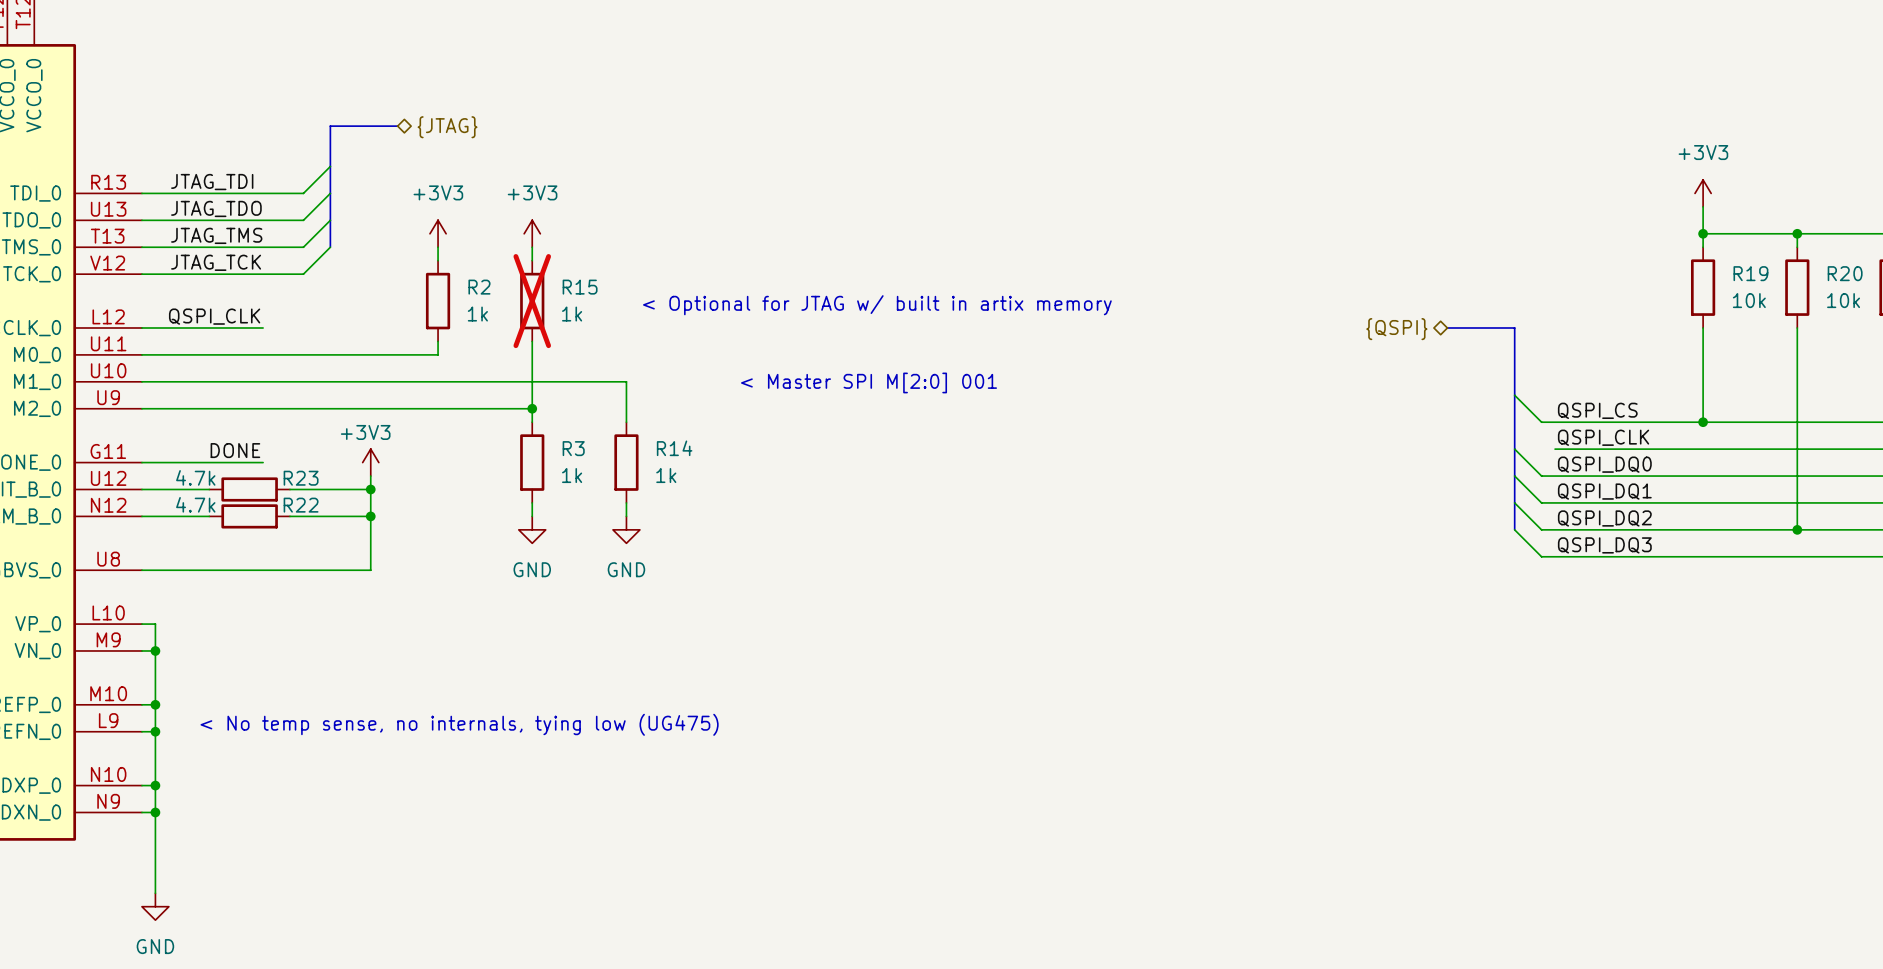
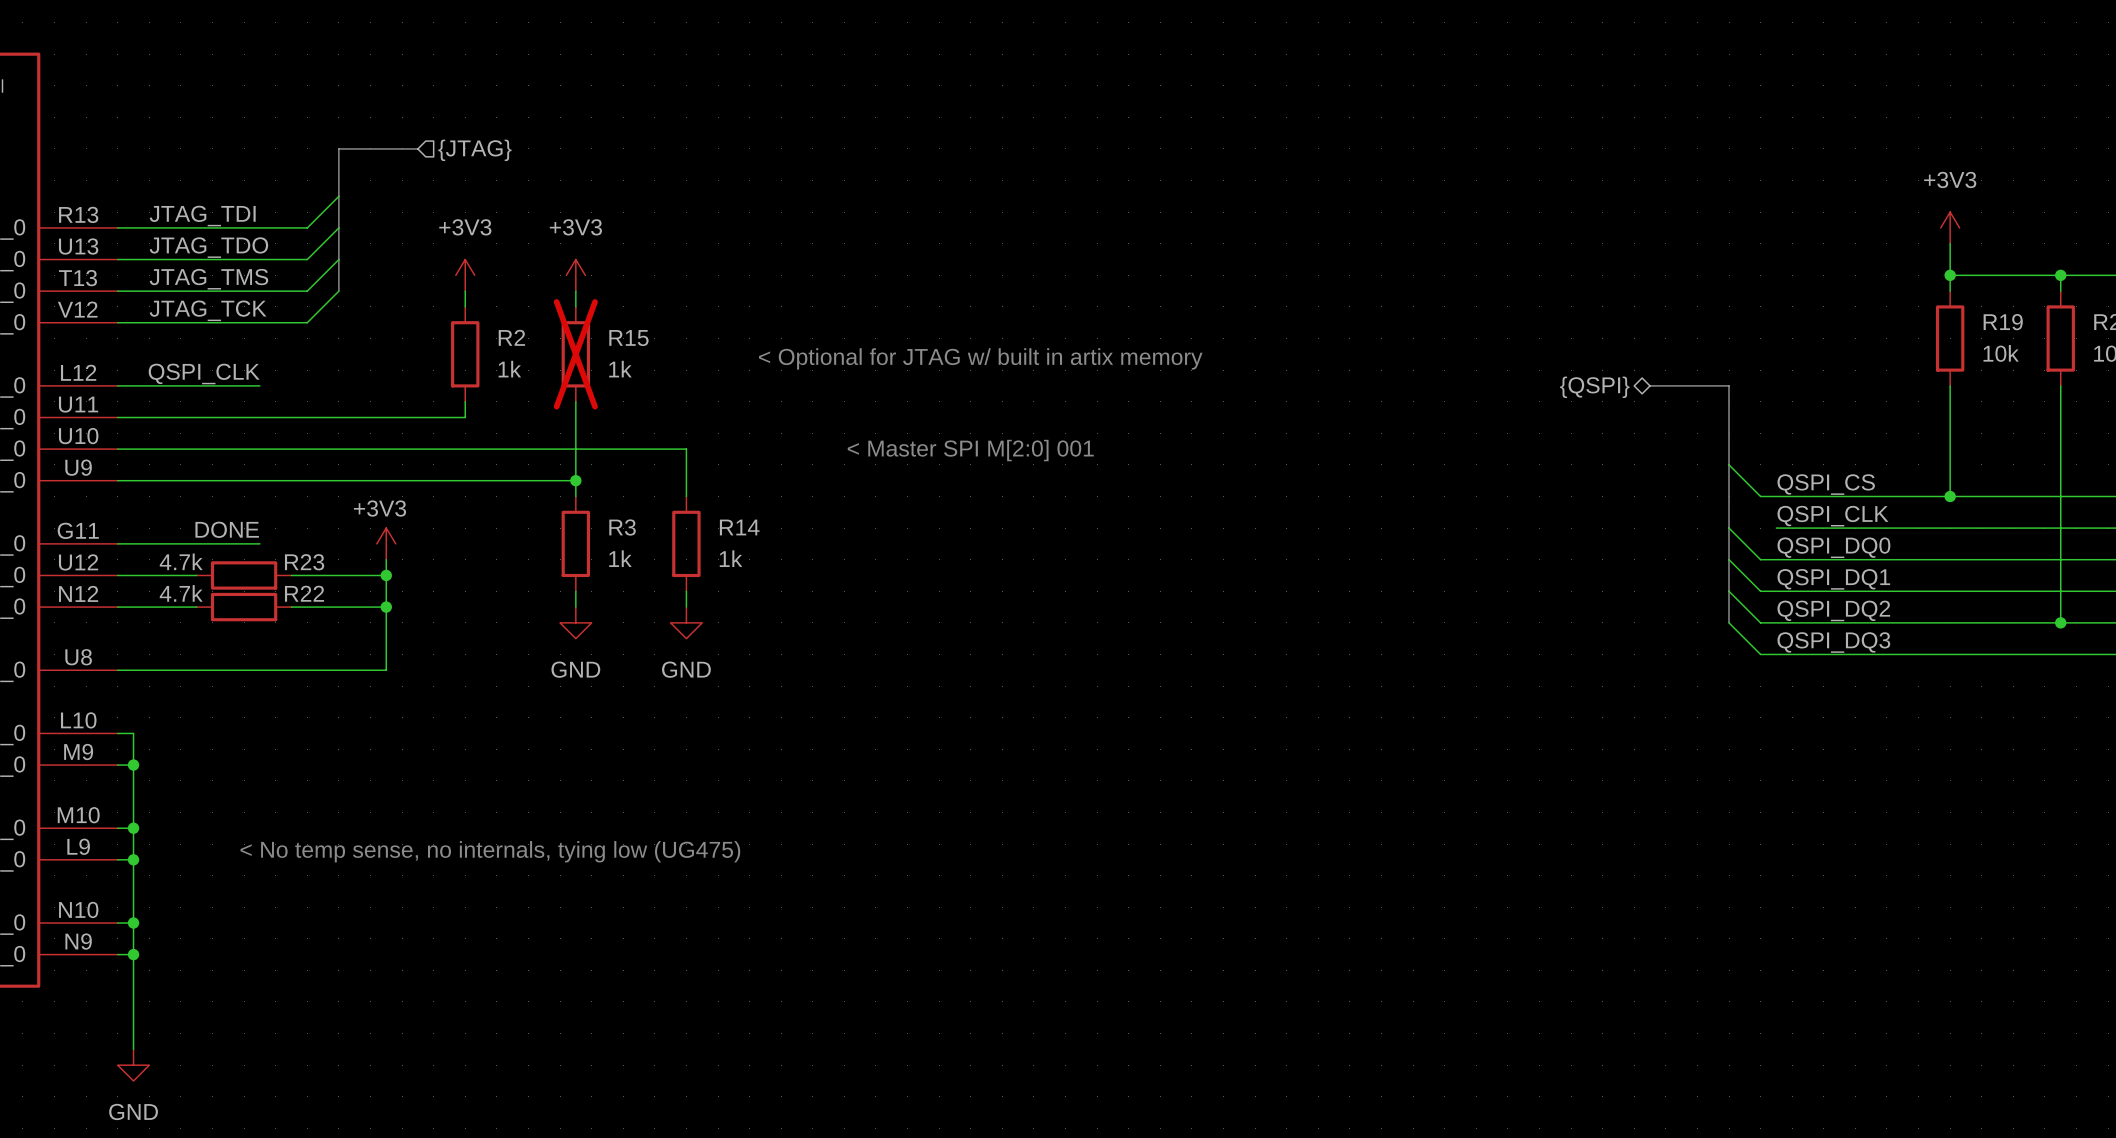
hierarchical label shape: bidirectional (447, 127) -> input (474, 150)

